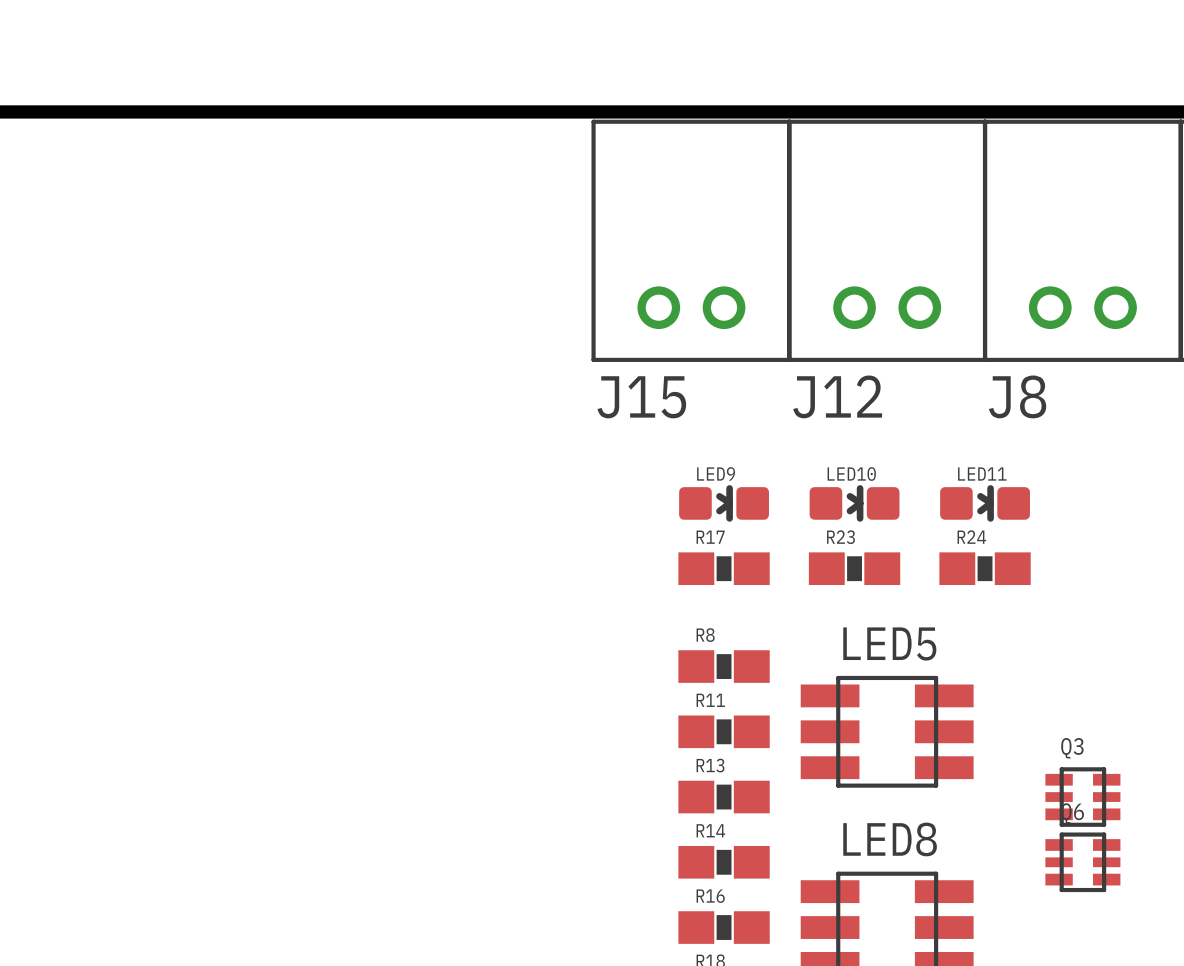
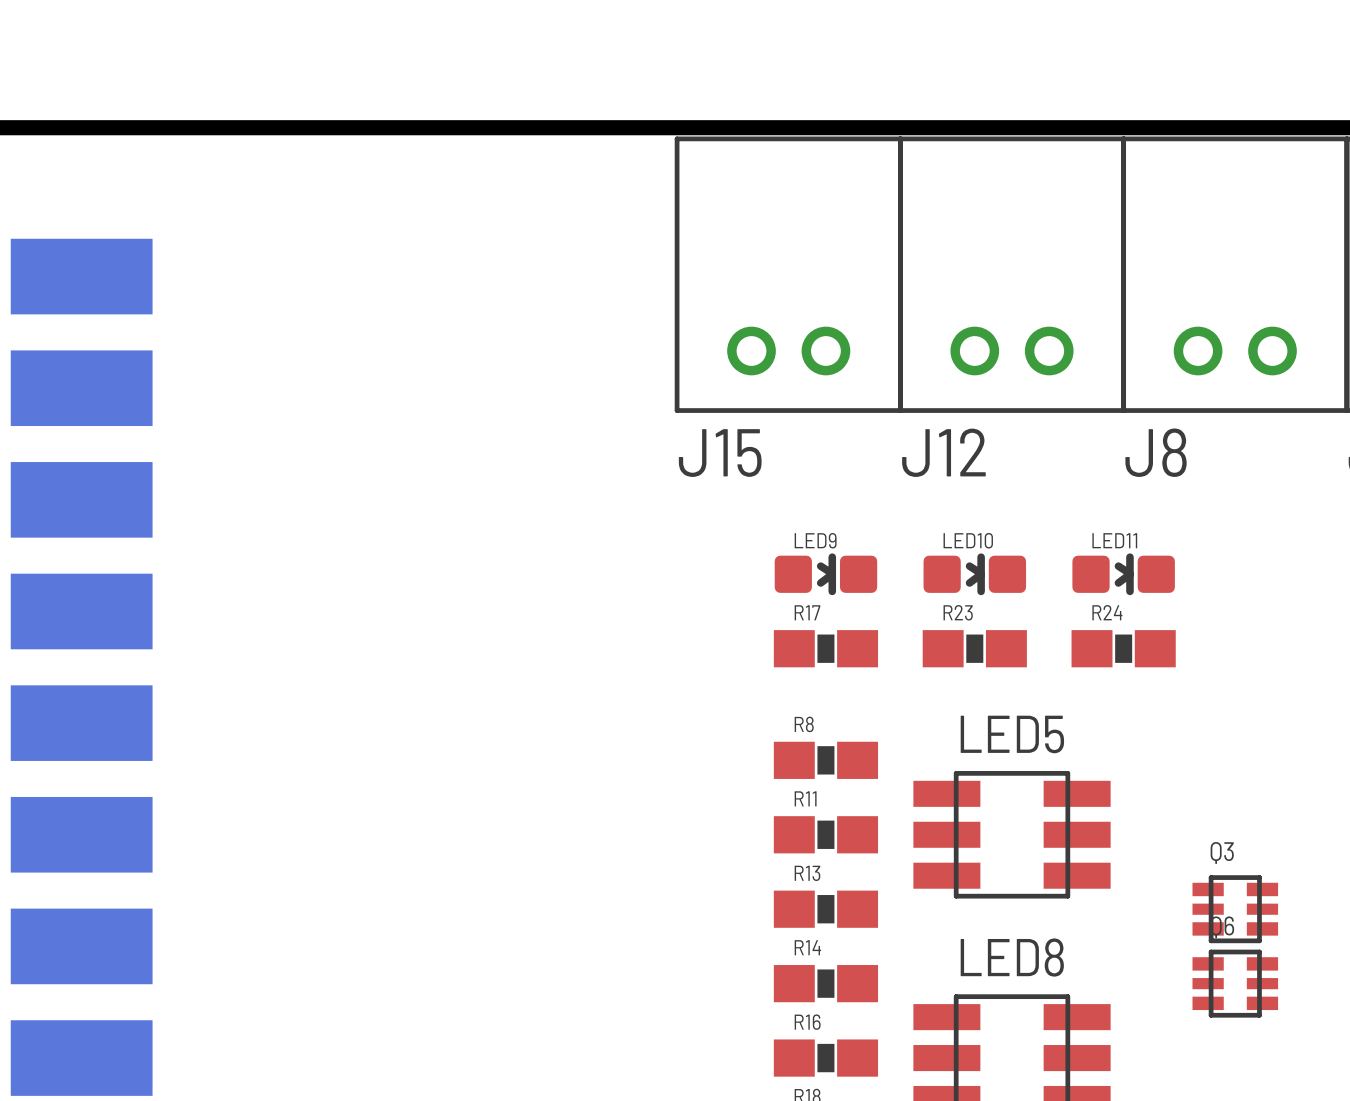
part: none -> (81, 276)
part: none -> (81, 388)
part: none -> (81, 499)
part: none -> (81, 611)
part: none -> (81, 723)
part: none -> (81, 834)
part: none -> (81, 946)
part: none -> (81, 1058)

